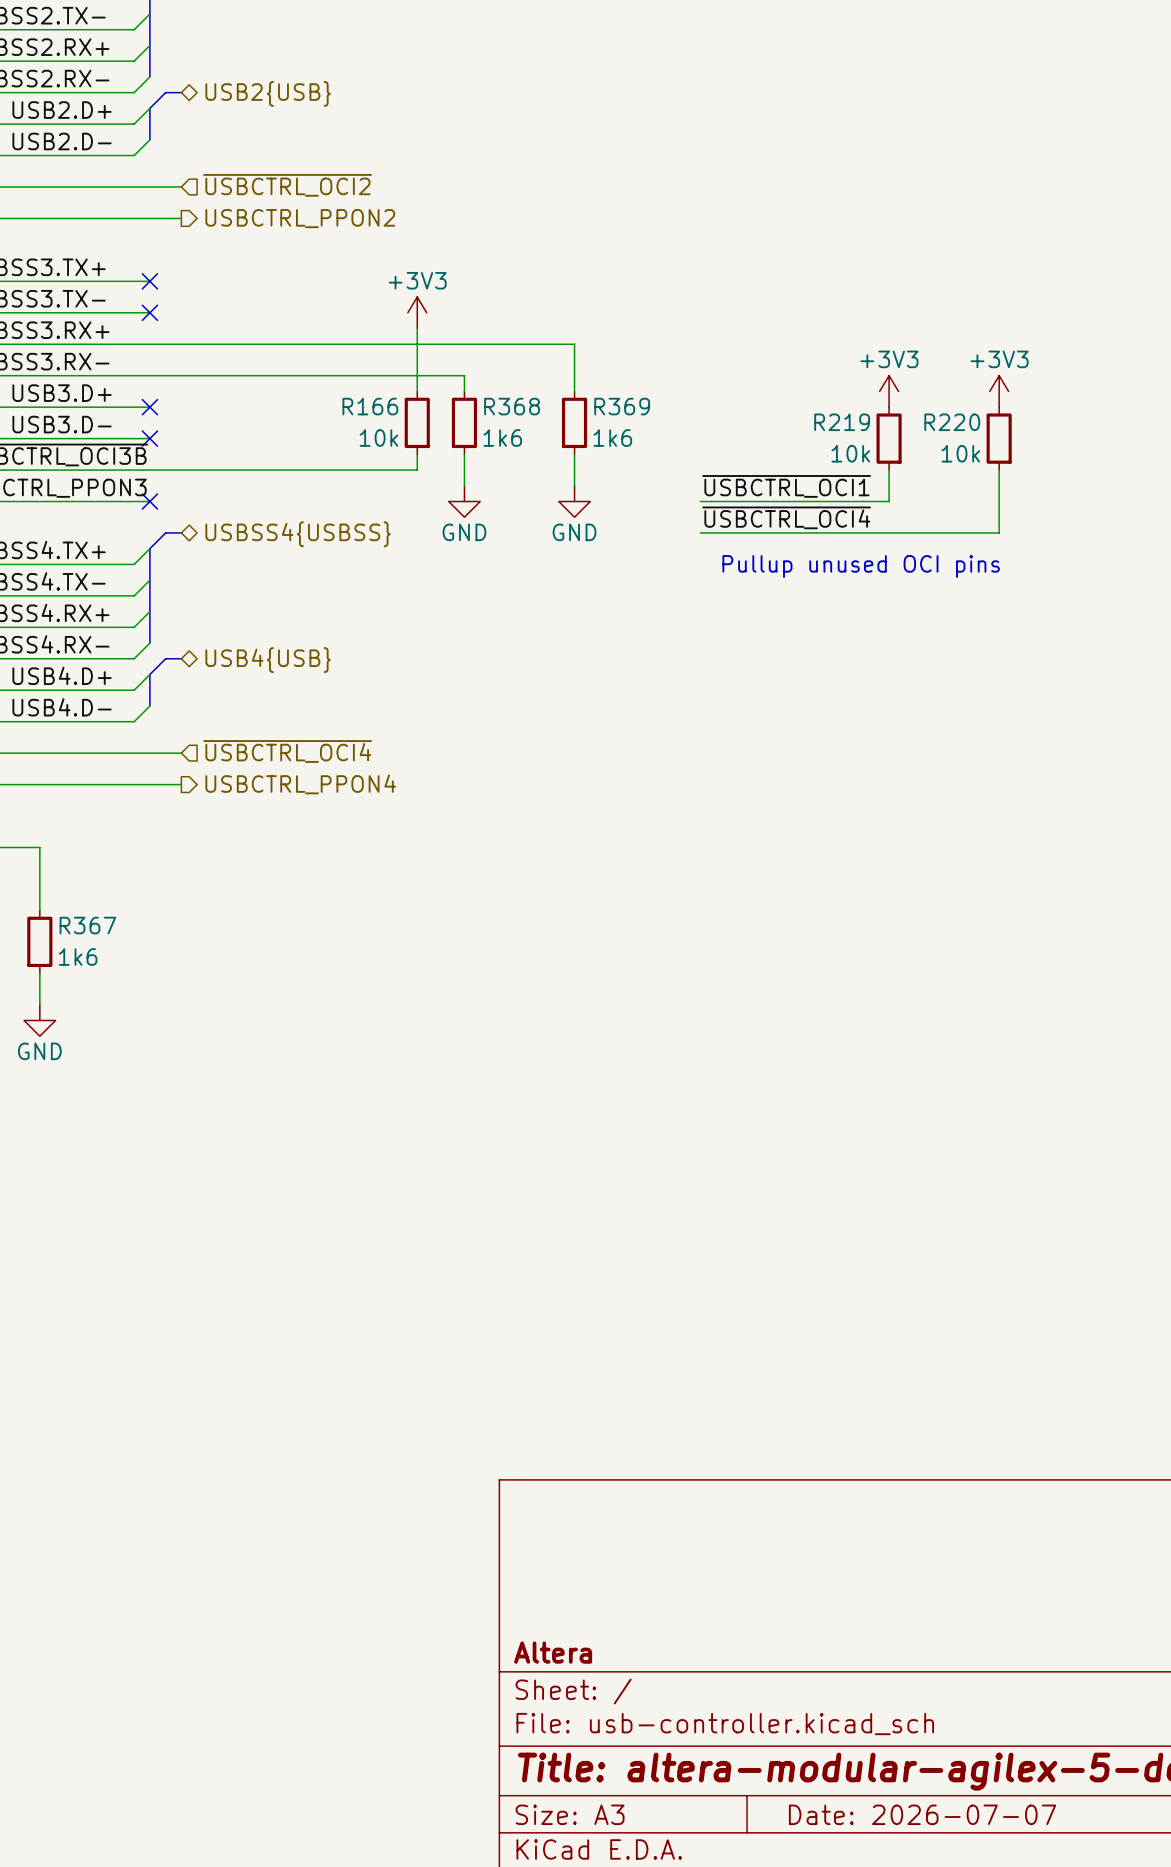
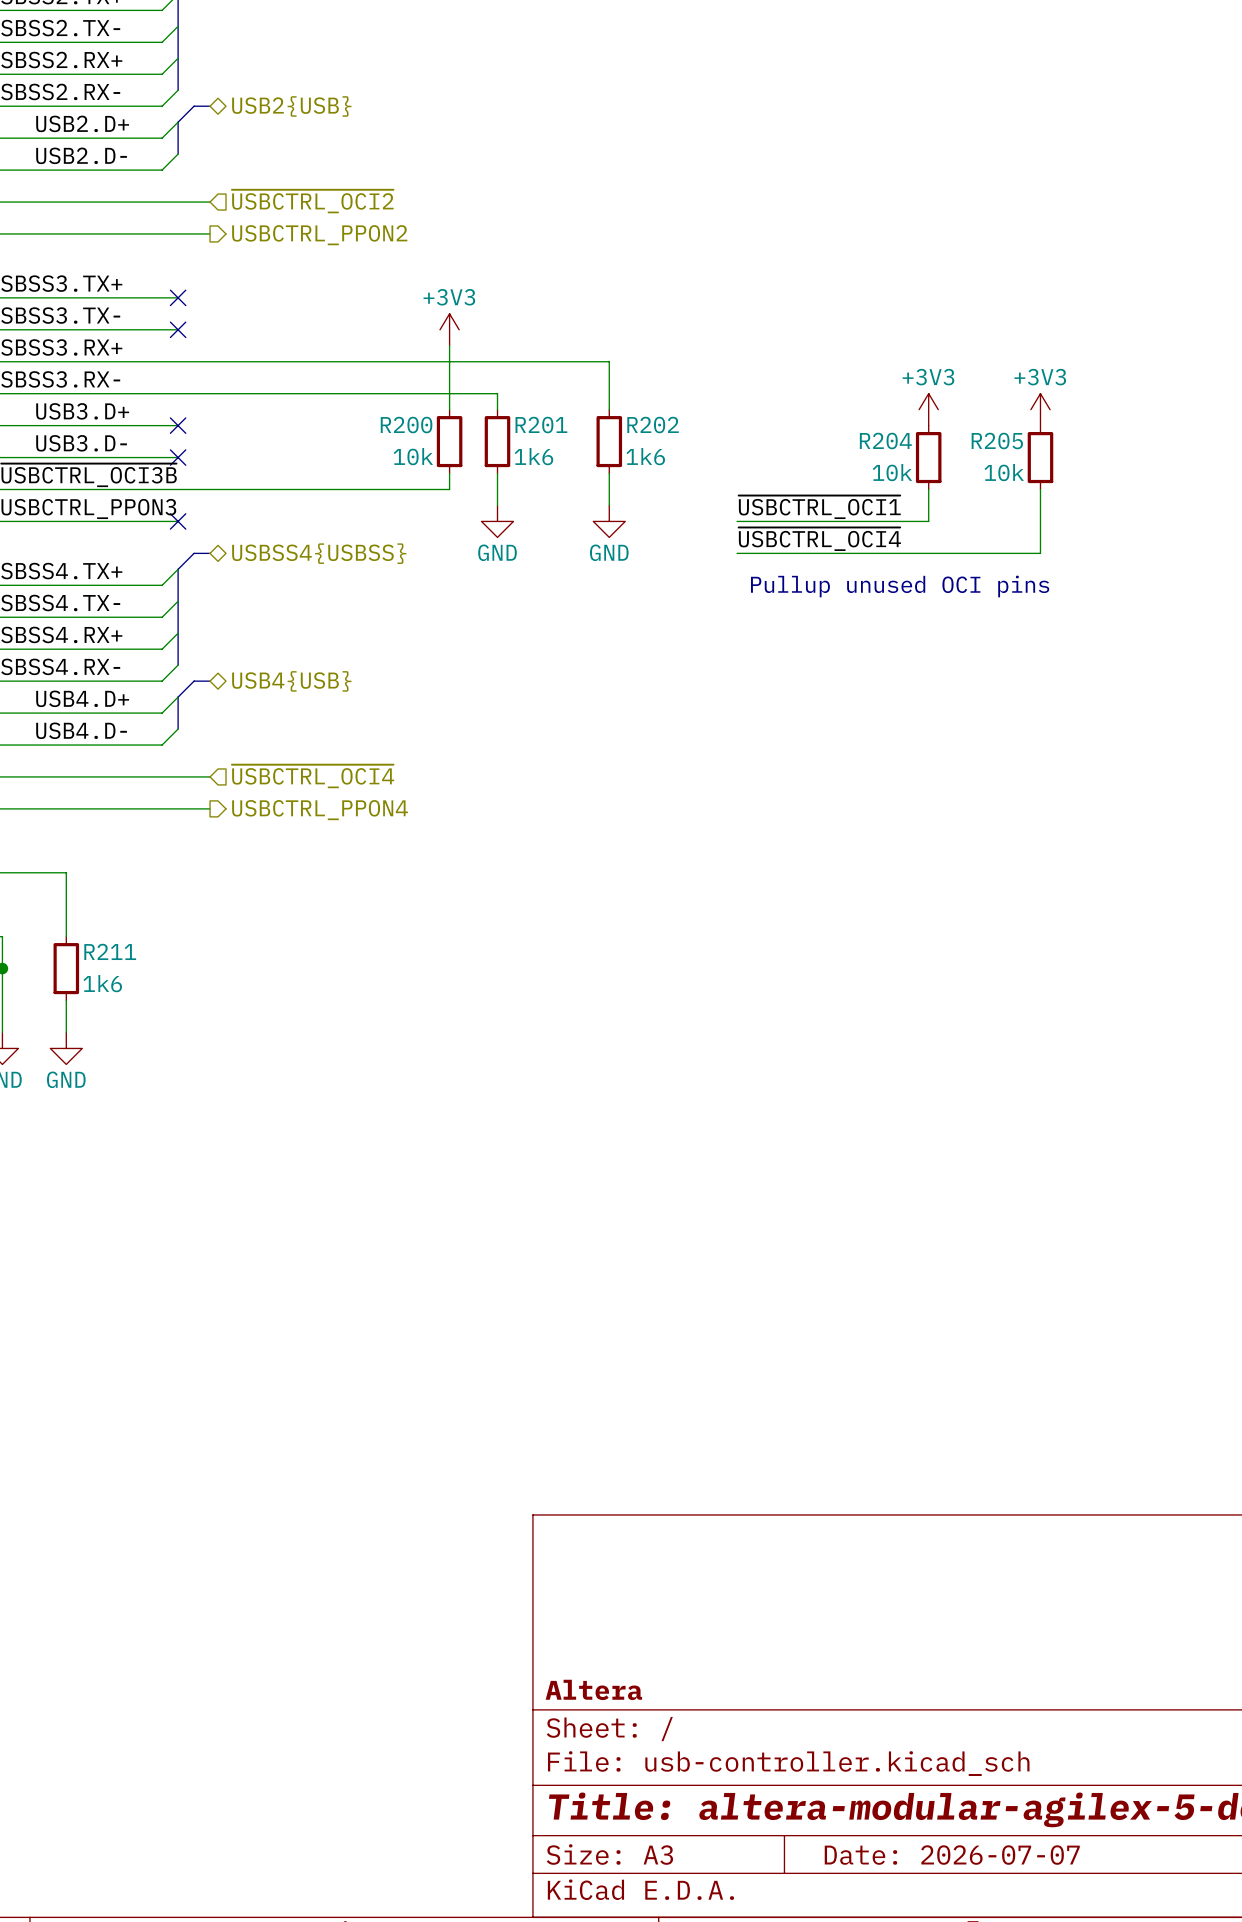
R166 name: R166 (370, 406) -> R200 (406, 425)
R368 name: R368 (512, 406) -> R201 (541, 425)
R369 name: R369 (622, 406) -> R202 (653, 425)
R219 name: R219 (842, 422) -> R204 (885, 440)
R220 name: R220 (952, 422) -> R205 (997, 440)
R367 name: R367 (87, 925) -> R211 (110, 951)

